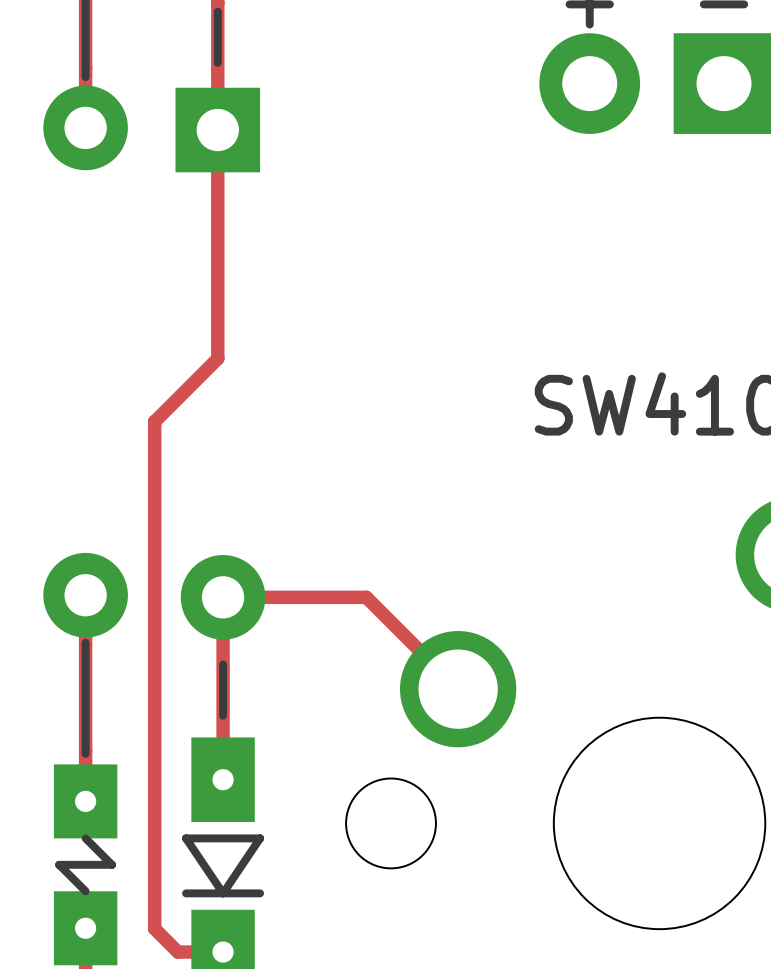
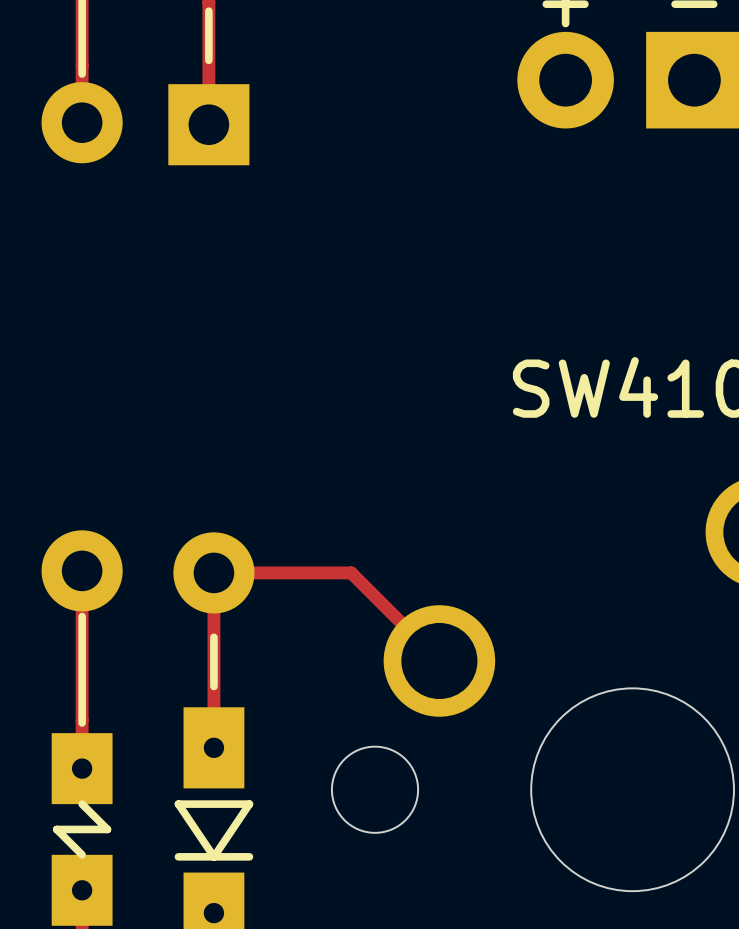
track: (217, 130) (217, 358) (154, 421) (154, 928) (177, 952) (223, 952) -> none

